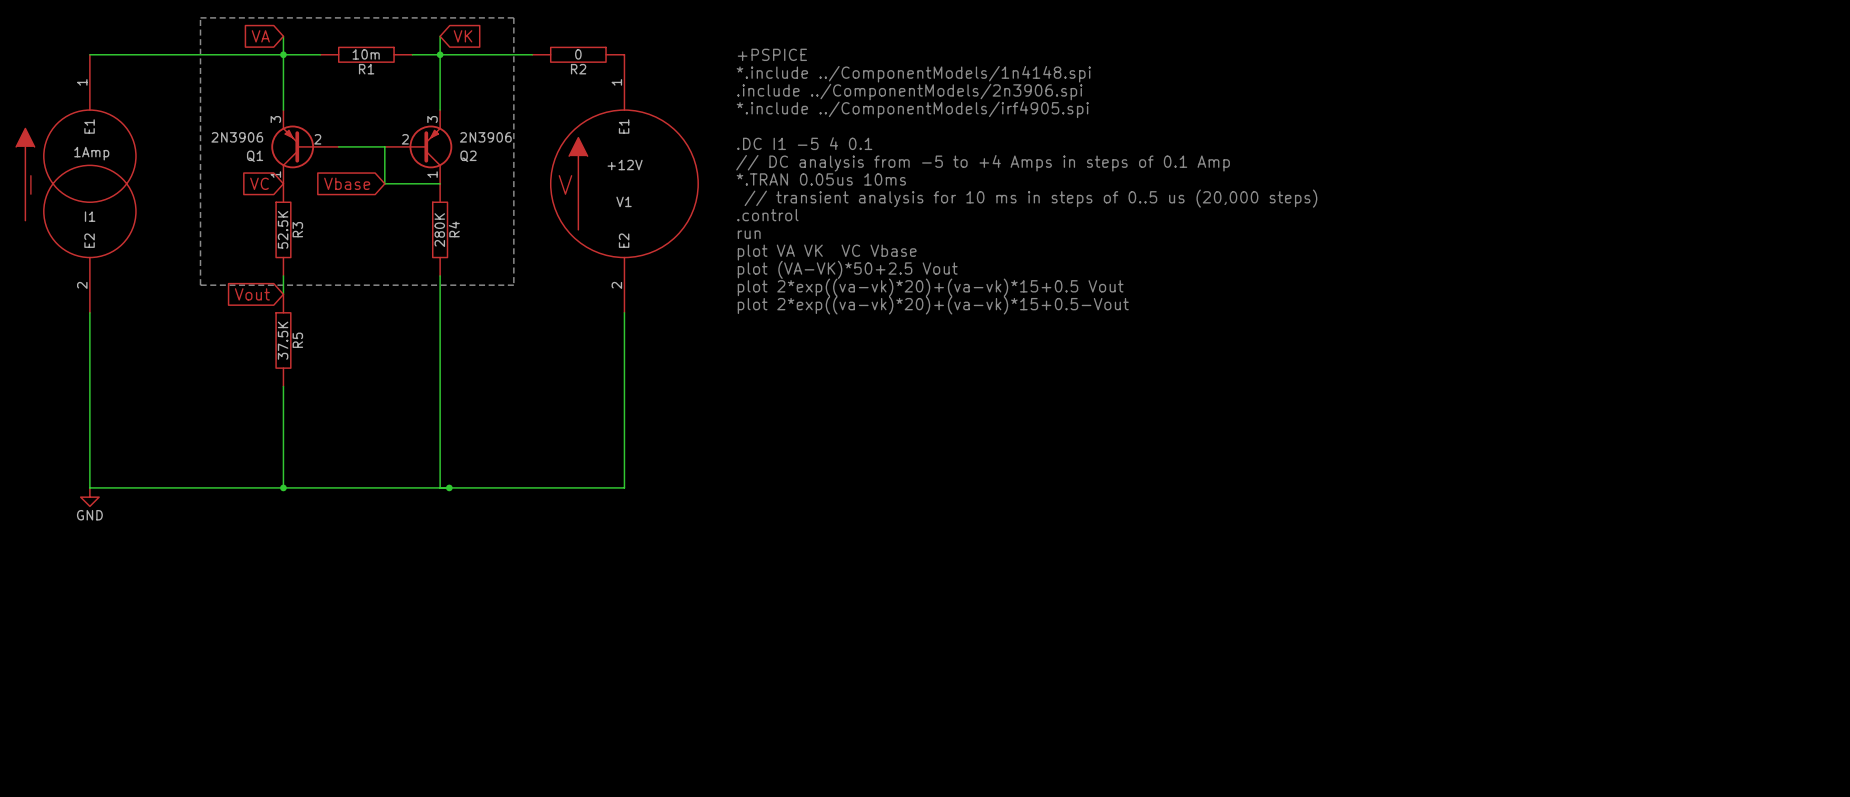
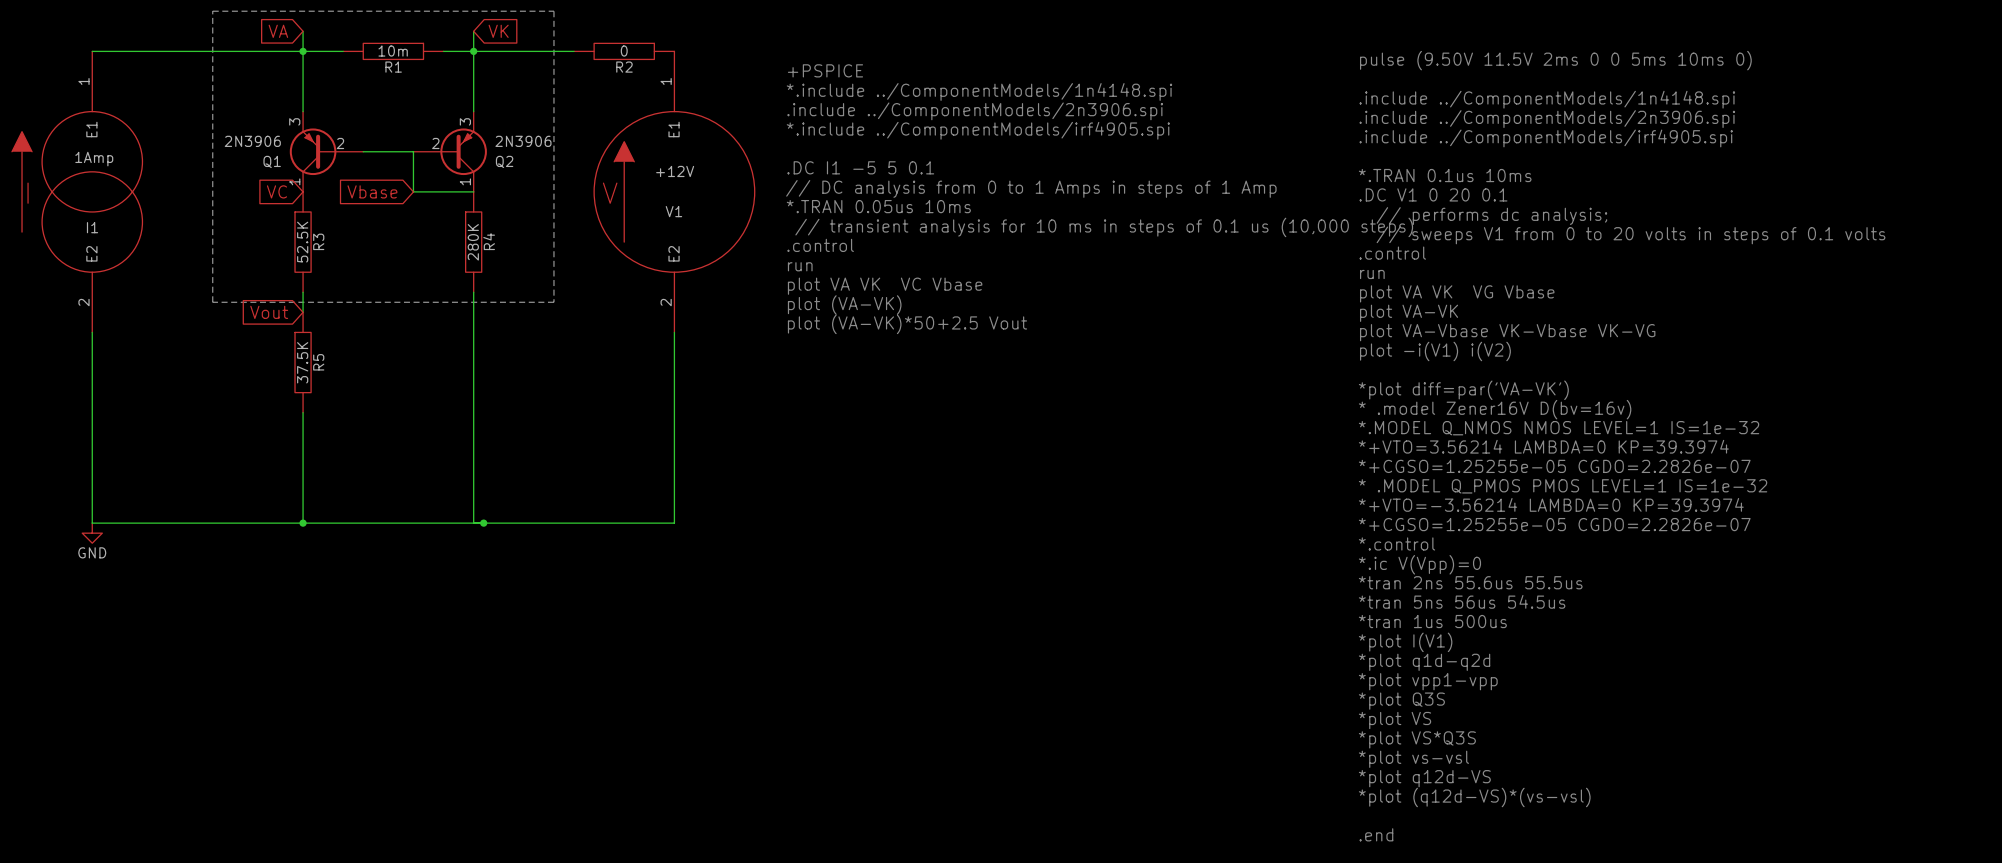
text position: +PSPICE (772, 54) -> +PSPICE (825, 70)
text: none -> pulse (9.50V 11.5V 2ms 0 0 5ms 10ms 0) (1555, 60)
text position: *.include ../ComponentModels/1n4148.spi (913, 74) -> *.include ../ComponentModels/1n4148.spi (979, 91)
text position: .include ../ComponentModels/2n3906.spi (909, 92) -> .include ../ComponentModels/2n3906.spi (975, 111)
text: none -> .include ../ComponentModels/1n4148.spi (1547, 99)
text position: *.include ../ComponentModels/irf4905.spi (912, 109) -> *.include ../ComponentModels/irf4905.spi (978, 130)
text: none -> .include ../ComponentModels/2n3906.spi (1547, 119)
text: none -> .include ../ComponentModels/irf4905.spi (1546, 138)
text: .DC I1 -5 4 0.1 (804, 143) -> .DC I1 -5 5 0.1 (860, 167)
text: // DC analysis from -5 to +4 Amps in steps of 0.1 Amp (983, 163) -> none
text: none -> *.TRAN 0.1us 10ms (1445, 175)
text position: *.TRAN 0.05us 10ms (821, 179) -> *.TRAN 0.05us 10ms (878, 206)
text: none -> // DC analysis from 0 to 1 Amps in steps of 1 Amp (1031, 188)
text: none -> .DC V1 0 20 0.1 (1433, 194)
text: // transient analysis for 10 ms in steps of 0..5 us (20,000 steps) (1030, 198) -> none
text: none -> // performs dc analysis; (1491, 216)
text position: .control (767, 215) -> .control (820, 245)
text: none -> // transient analysis for 10 ms in steps of 0.1 us (10,000 steps) (1104, 227)
text: none -> // sweeps V1 from 0 to 20 volts in steps of 0.1 volts (1631, 235)
text position: run (749, 234) -> run (800, 266)
text: none -> .control (1392, 253)
text position: plot VA VK VC Vbase (827, 252) -> plot VA VK VC Vbase (885, 286)
text: none -> run (1372, 274)
text position: plot (VA-VK)*50+2.5 Vout (847, 269) -> plot (VA-VK)*50+2.5 Vout (907, 324)
text: none -> plot VA VK VG Vbase (1457, 293)
text: none -> plot (VA-VK) (844, 305)
text: plot 2*exp((va-vk)*20)+(va-vk)*15+0.5 Vout (930, 287) -> none
text: none -> plot VA-VK (1409, 313)
text: plot 2*exp((va-vk)*20)+(va-vk)*15+0.5-Vout (933, 305) -> none
text: none -> plot VA-Vbase VK-Vbase VK-VG (1507, 332)
text: none -> plot -i(V1) i(V2) (1435, 351)
text: none -> *plot diff=par('VA-VK') (1463, 390)
text: none -> * .model Zener16V D(bv=16v) (1495, 409)
text: none -> *.MODEL Q_NMOS NMOS LEVEL=1 IS=1e-32 (1559, 428)
text: none -> *+VTO=3.56214 LAMBDA=0 KP=39.3974 (1543, 446)
text: none -> *+CGSO=1.25255e-05 CGDO=2.2826e-07 (1554, 466)
text: none -> * .MODEL Q_PMOS PMOS LEVEL=1 IS=1e-32 (1563, 486)
text: none -> *+VTO=-3.56214 LAMBDA=0 KP=39.3974 (1551, 504)
text: none -> *+CGSO=1.25255e-05 CGDO=2.2826e-07 (1554, 524)
text: none -> *.control (1397, 543)
text: none -> *.ic V(Vpp)=0 (1419, 564)
text: none -> *tran 2ns 55.6us 55.5us (1470, 582)
text: none -> *tran 5ns 56us 54.5us (1462, 601)
text: none -> *tran 1us 500us (1432, 621)
text: none -> *plot I(V1) (1405, 642)
text: none -> *plot q1d-q2d (1424, 662)
text: none -> *plot vpp1-vpp (1428, 681)
text: none -> *plot Q3S (1401, 701)
text: none -> *plot VS (1395, 720)
text: none -> *plot VS*Q3S (1417, 739)
text: none -> *plot vs-vsl (1413, 759)
text: none -> *plot q12d-VS (1424, 778)
text: none -> *plot (q12d-VS)*(vs-vsl) (1474, 797)
text: none -> .end (1376, 834)

